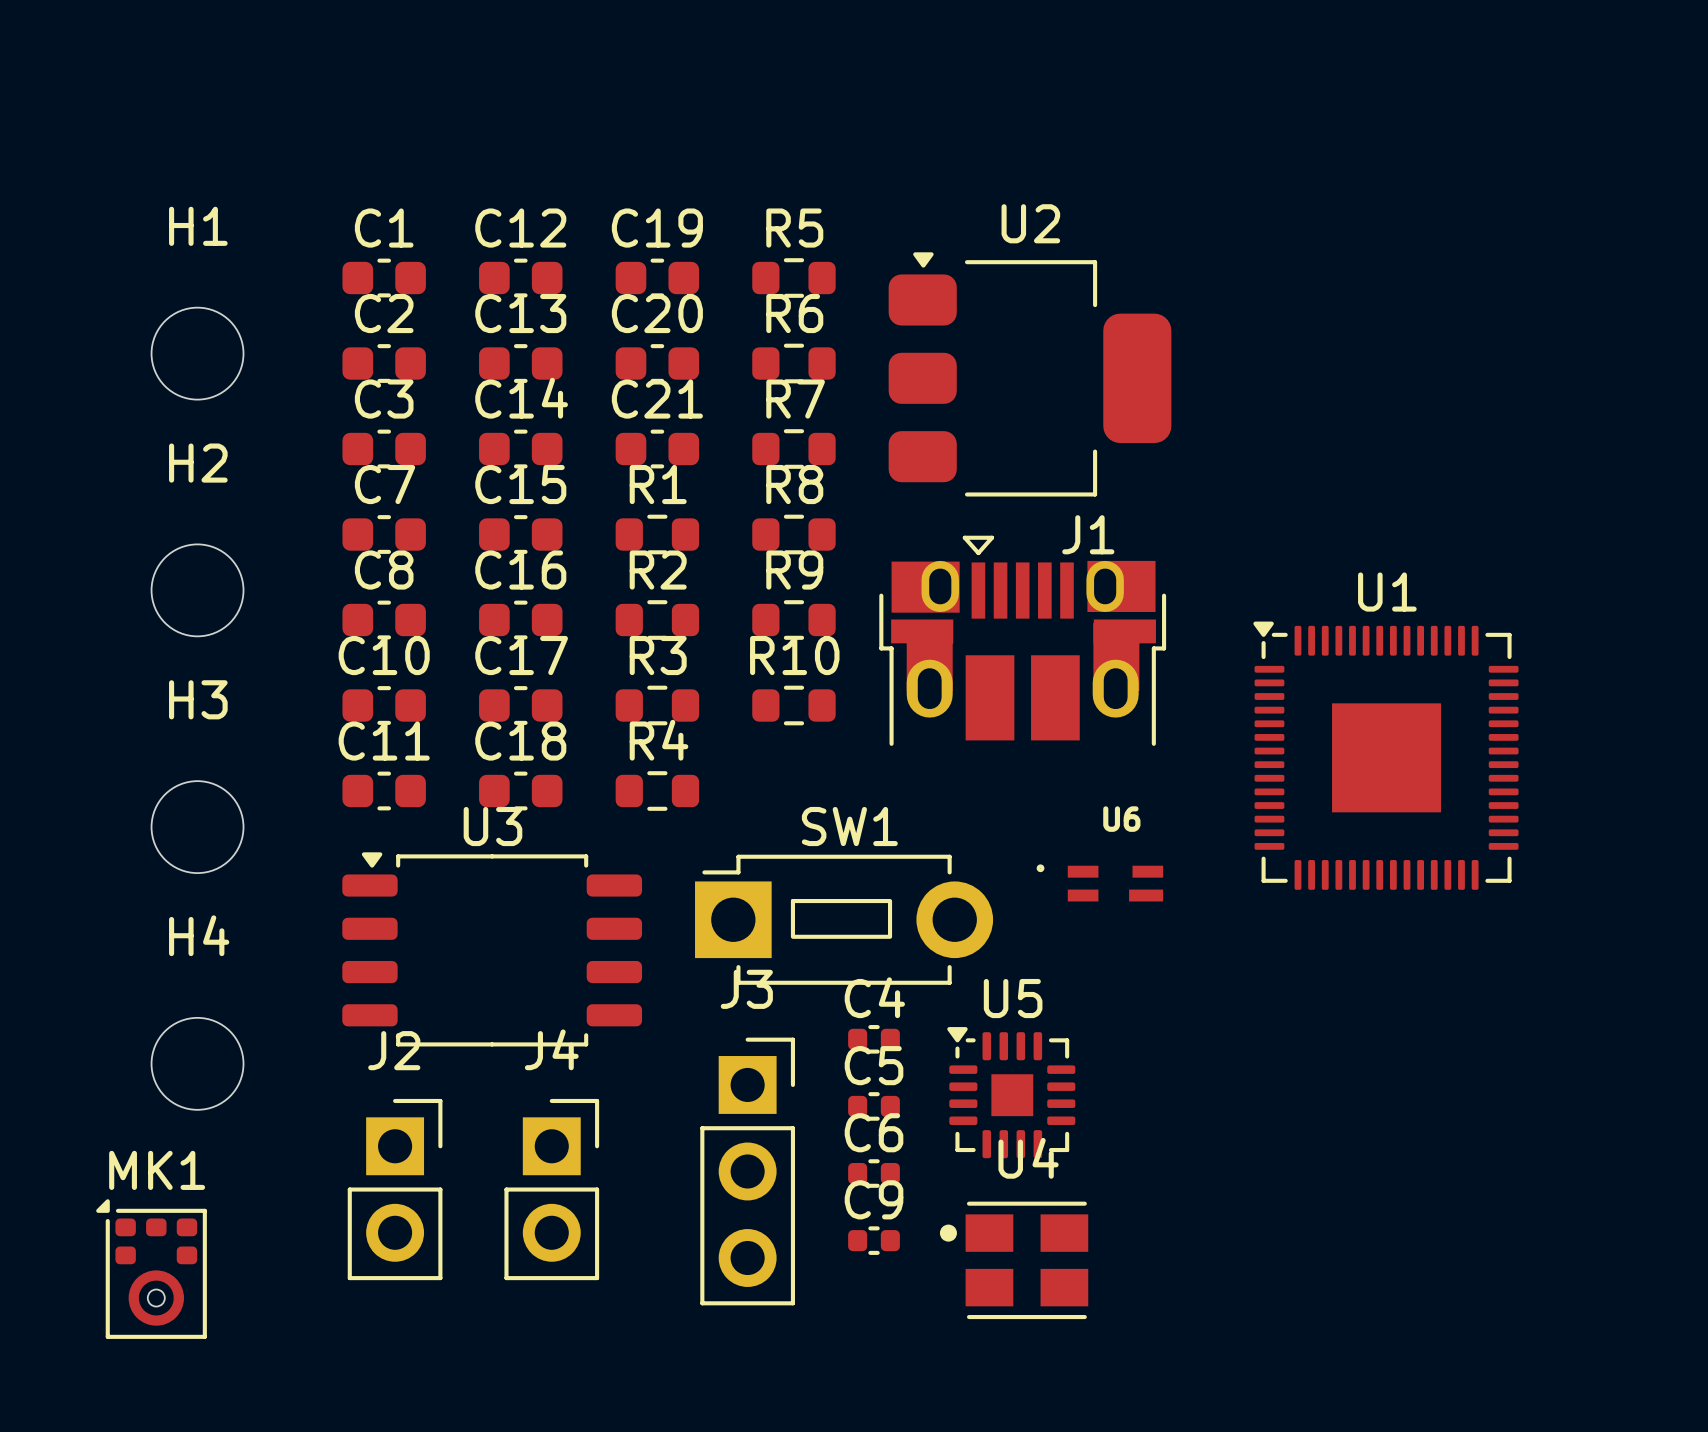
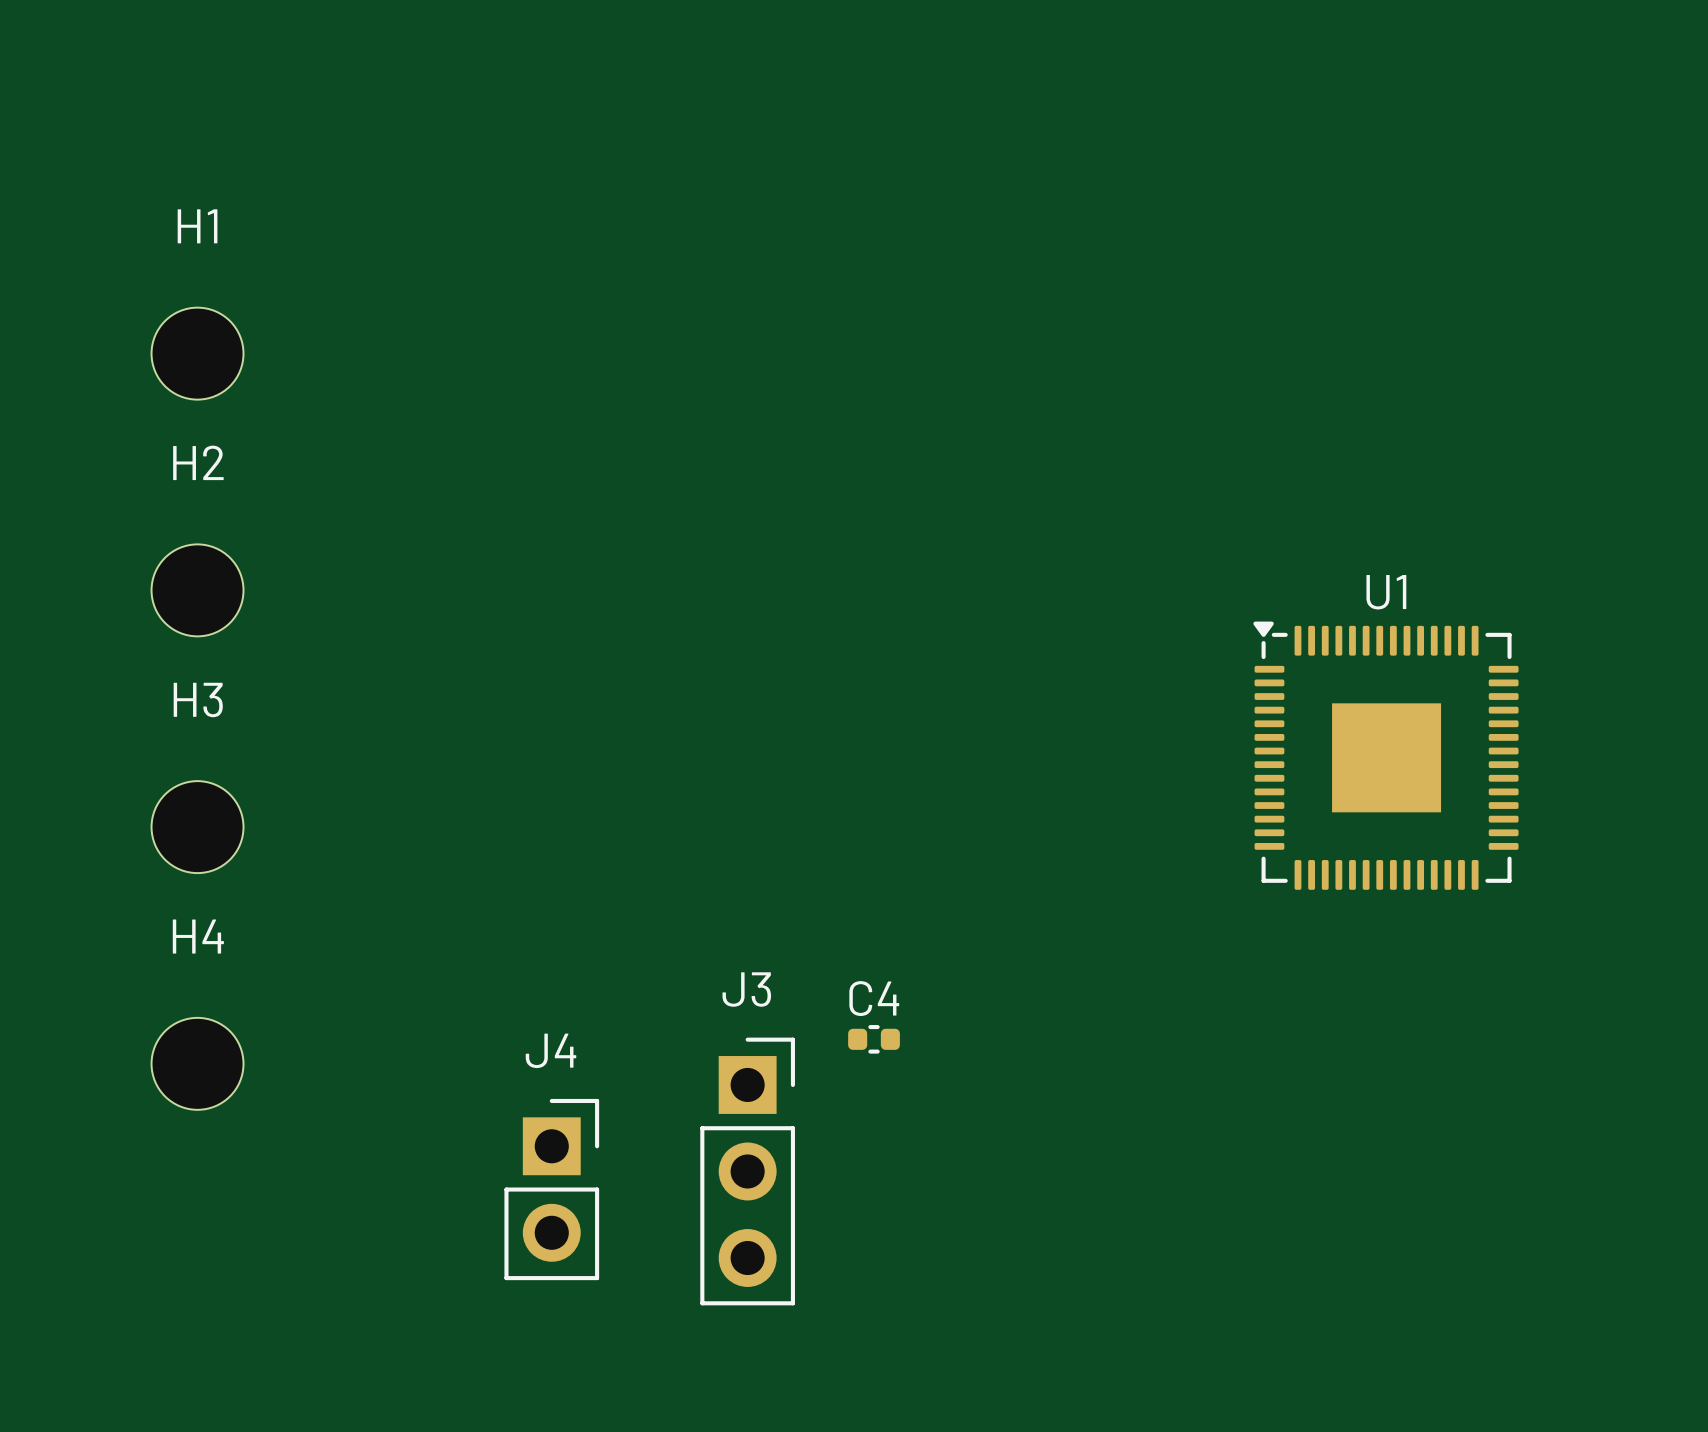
C1: (384, 278) -> none
C12: (520, 278) -> none
C19: (657, 278) -> none
R5: (793, 278) -> none
C2: (384, 363) -> none
C13: (520, 363) -> none
C20: (657, 363) -> none
R6: (793, 363) -> none
U2: (1030, 374) -> none
C3: (384, 449) -> none
C14: (520, 449) -> none
C21: (657, 449) -> none
R7: (793, 449) -> none
C7: (384, 534) -> none
C15: (520, 534) -> none
R1: (657, 534) -> none
R8: (793, 534) -> none
C8: (384, 620) -> none
C16: (520, 620) -> none
R2: (657, 620) -> none
R9: (793, 620) -> none
J1: (1022, 640) -> none
C10: (384, 705) -> none
C17: (520, 705) -> none
R3: (657, 705) -> none
R10: (793, 705) -> none
C11: (384, 791) -> none
C18: (520, 791) -> none
R4: (657, 791) -> none
U6: (1099, 882) -> none
SW1: (844, 919) -> none
U3: (492, 949) -> none
U5: (1011, 1092) -> none
C5: (874, 1106) -> none
C6: (874, 1173) -> none
J2: (395, 1189) -> none
C9: (874, 1240) -> none
U4: (1014, 1260) -> none
MK1: (151, 1269) -> none

